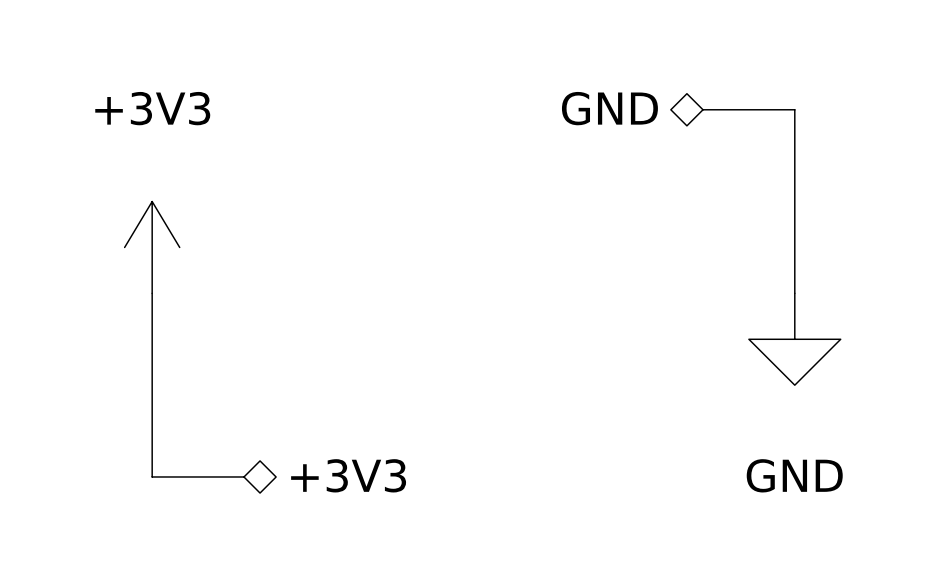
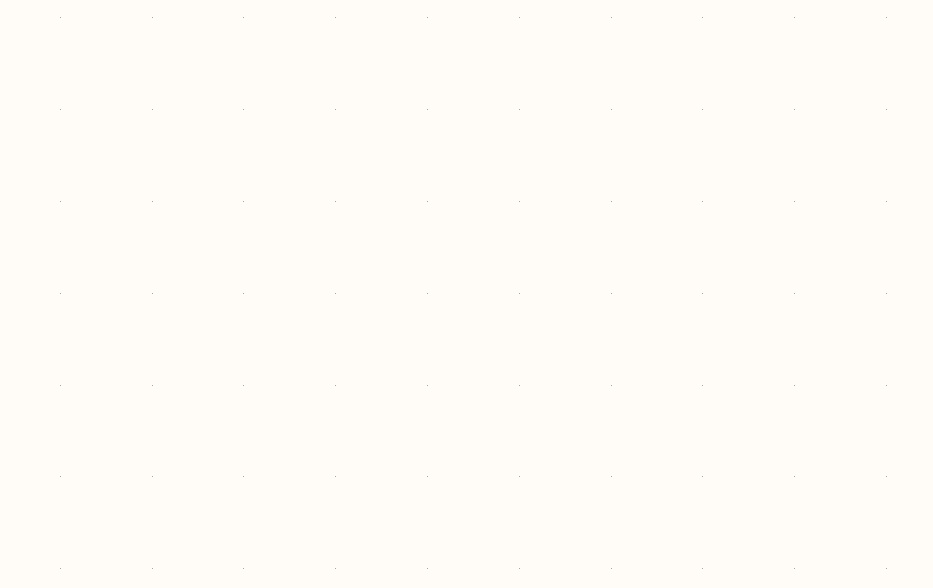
hierarchical label: GND (609, 108) -> none
wire: (702, 109) (794, 109) (794, 293) -> none
power symbol: +3V3 (152, 247) -> none
wire: (152, 293) (152, 476) (243, 476) -> none
power symbol: GND (794, 339) -> none
hierarchical label: +3V3 (348, 475) -> none

